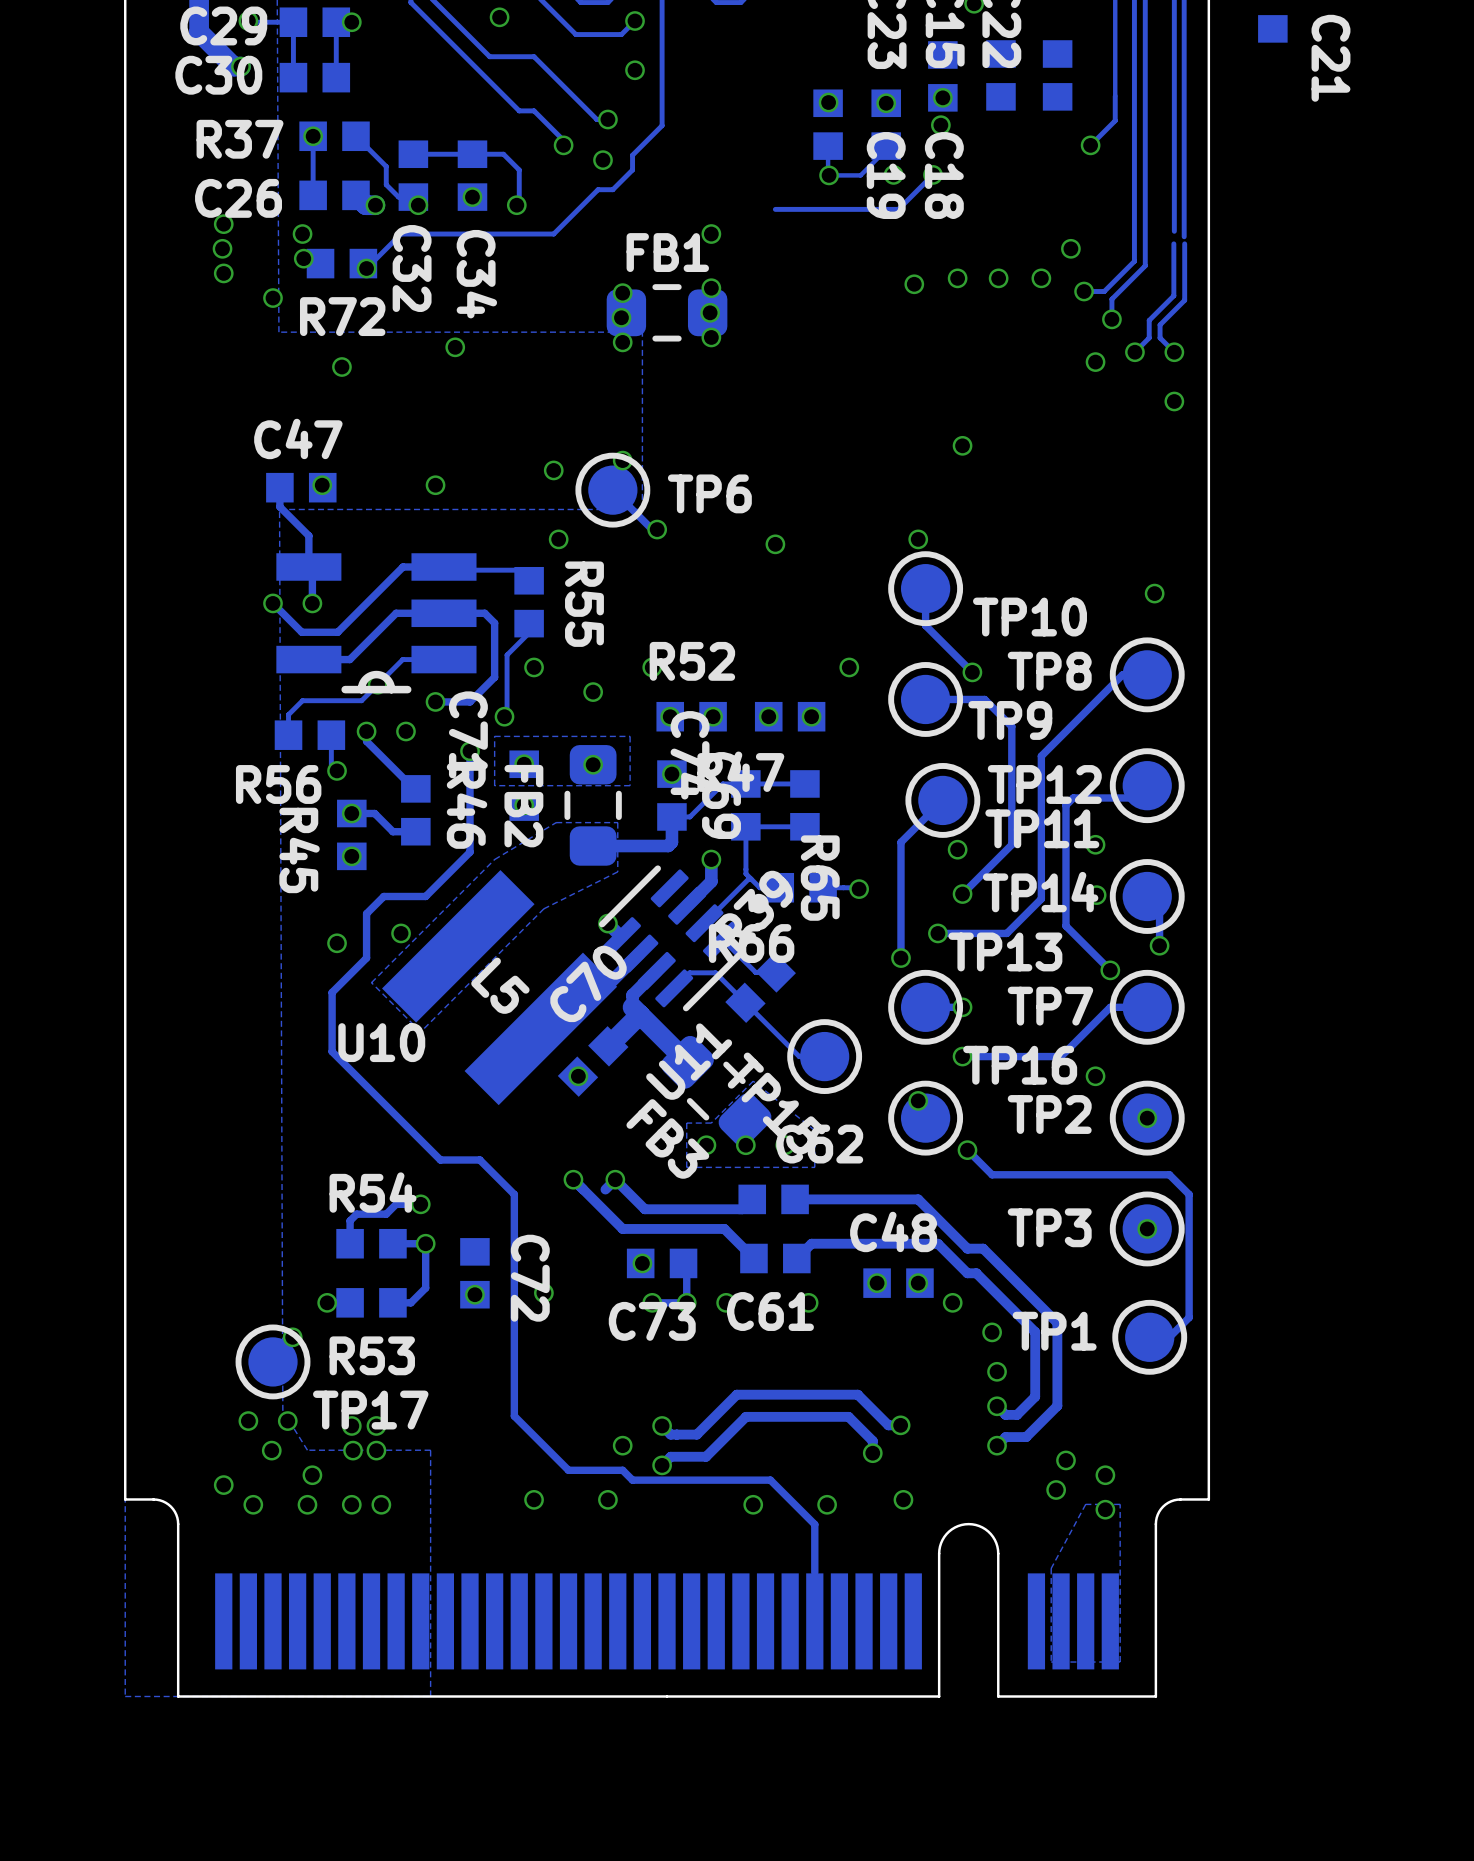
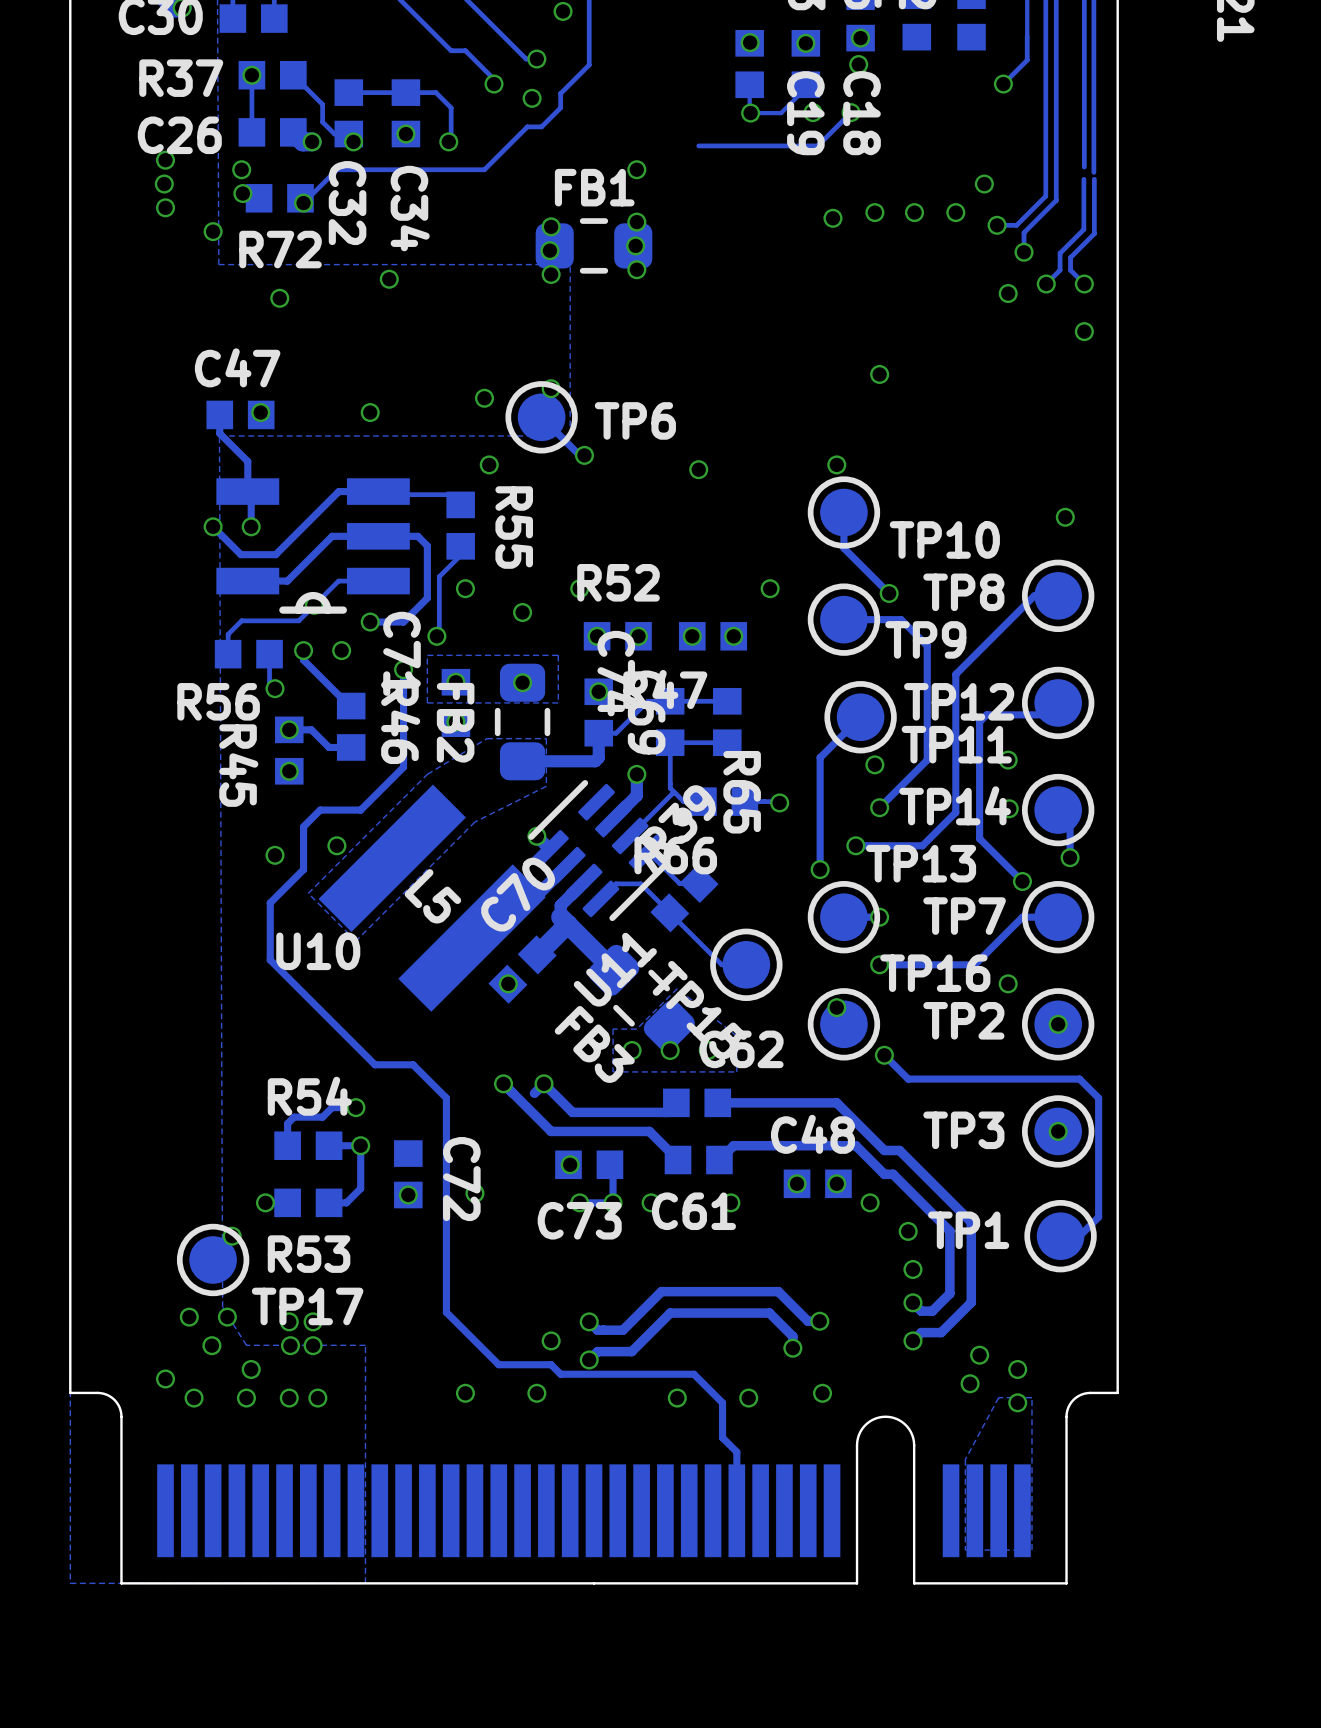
track: (800, 1509) (814, 1524) (814, 1560) -> (722, 1402) (722, 1437) (736, 1452)

